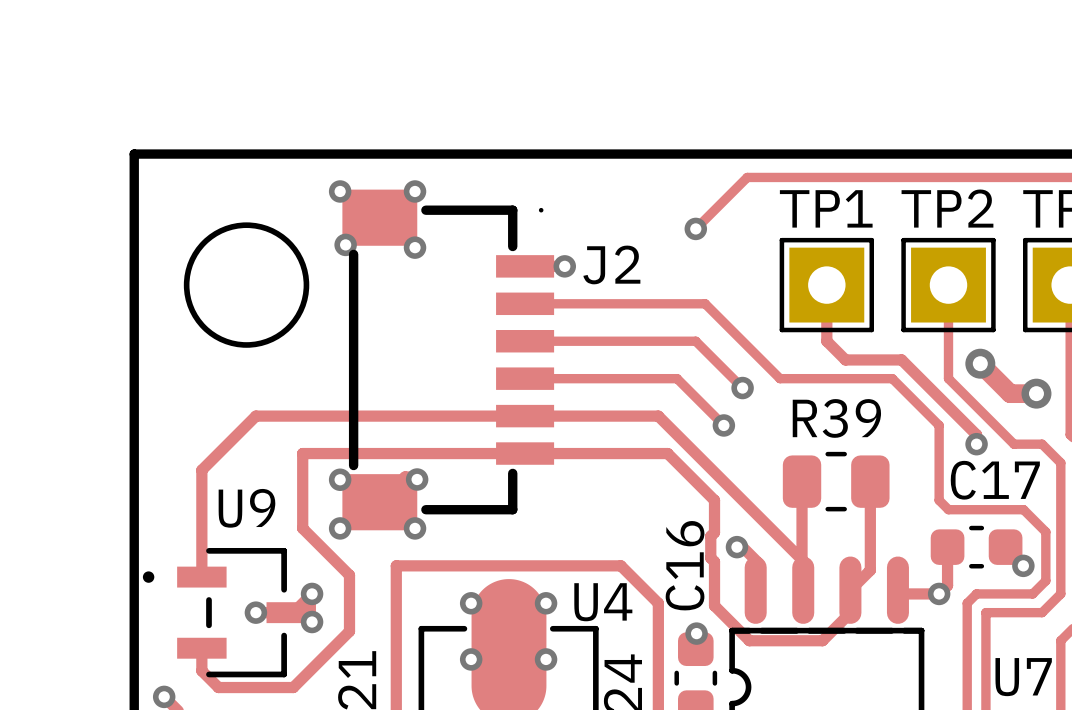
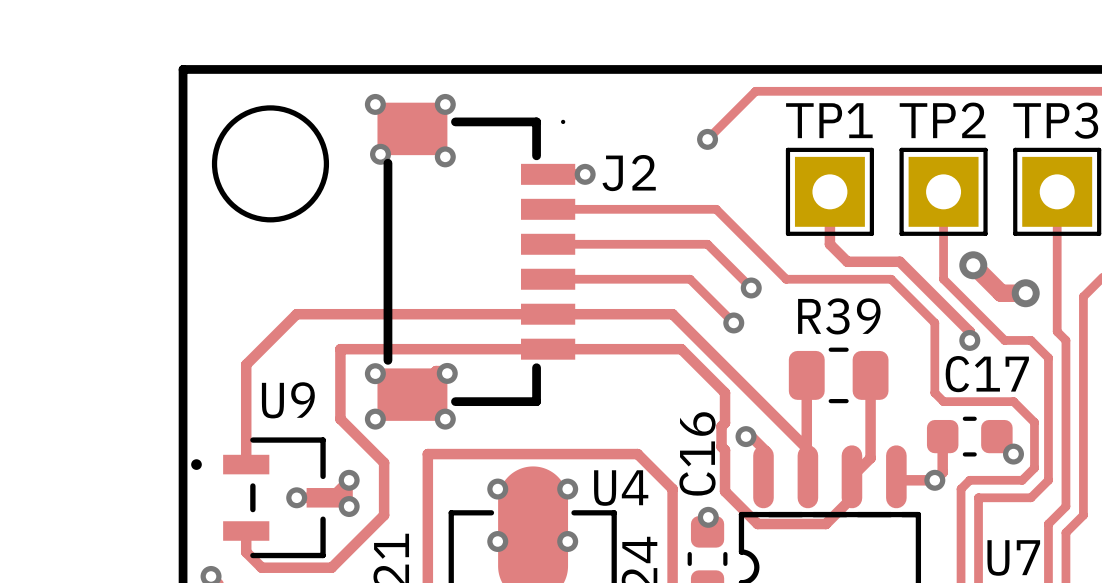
round board edge position: (246, 285) -> (270, 163)

